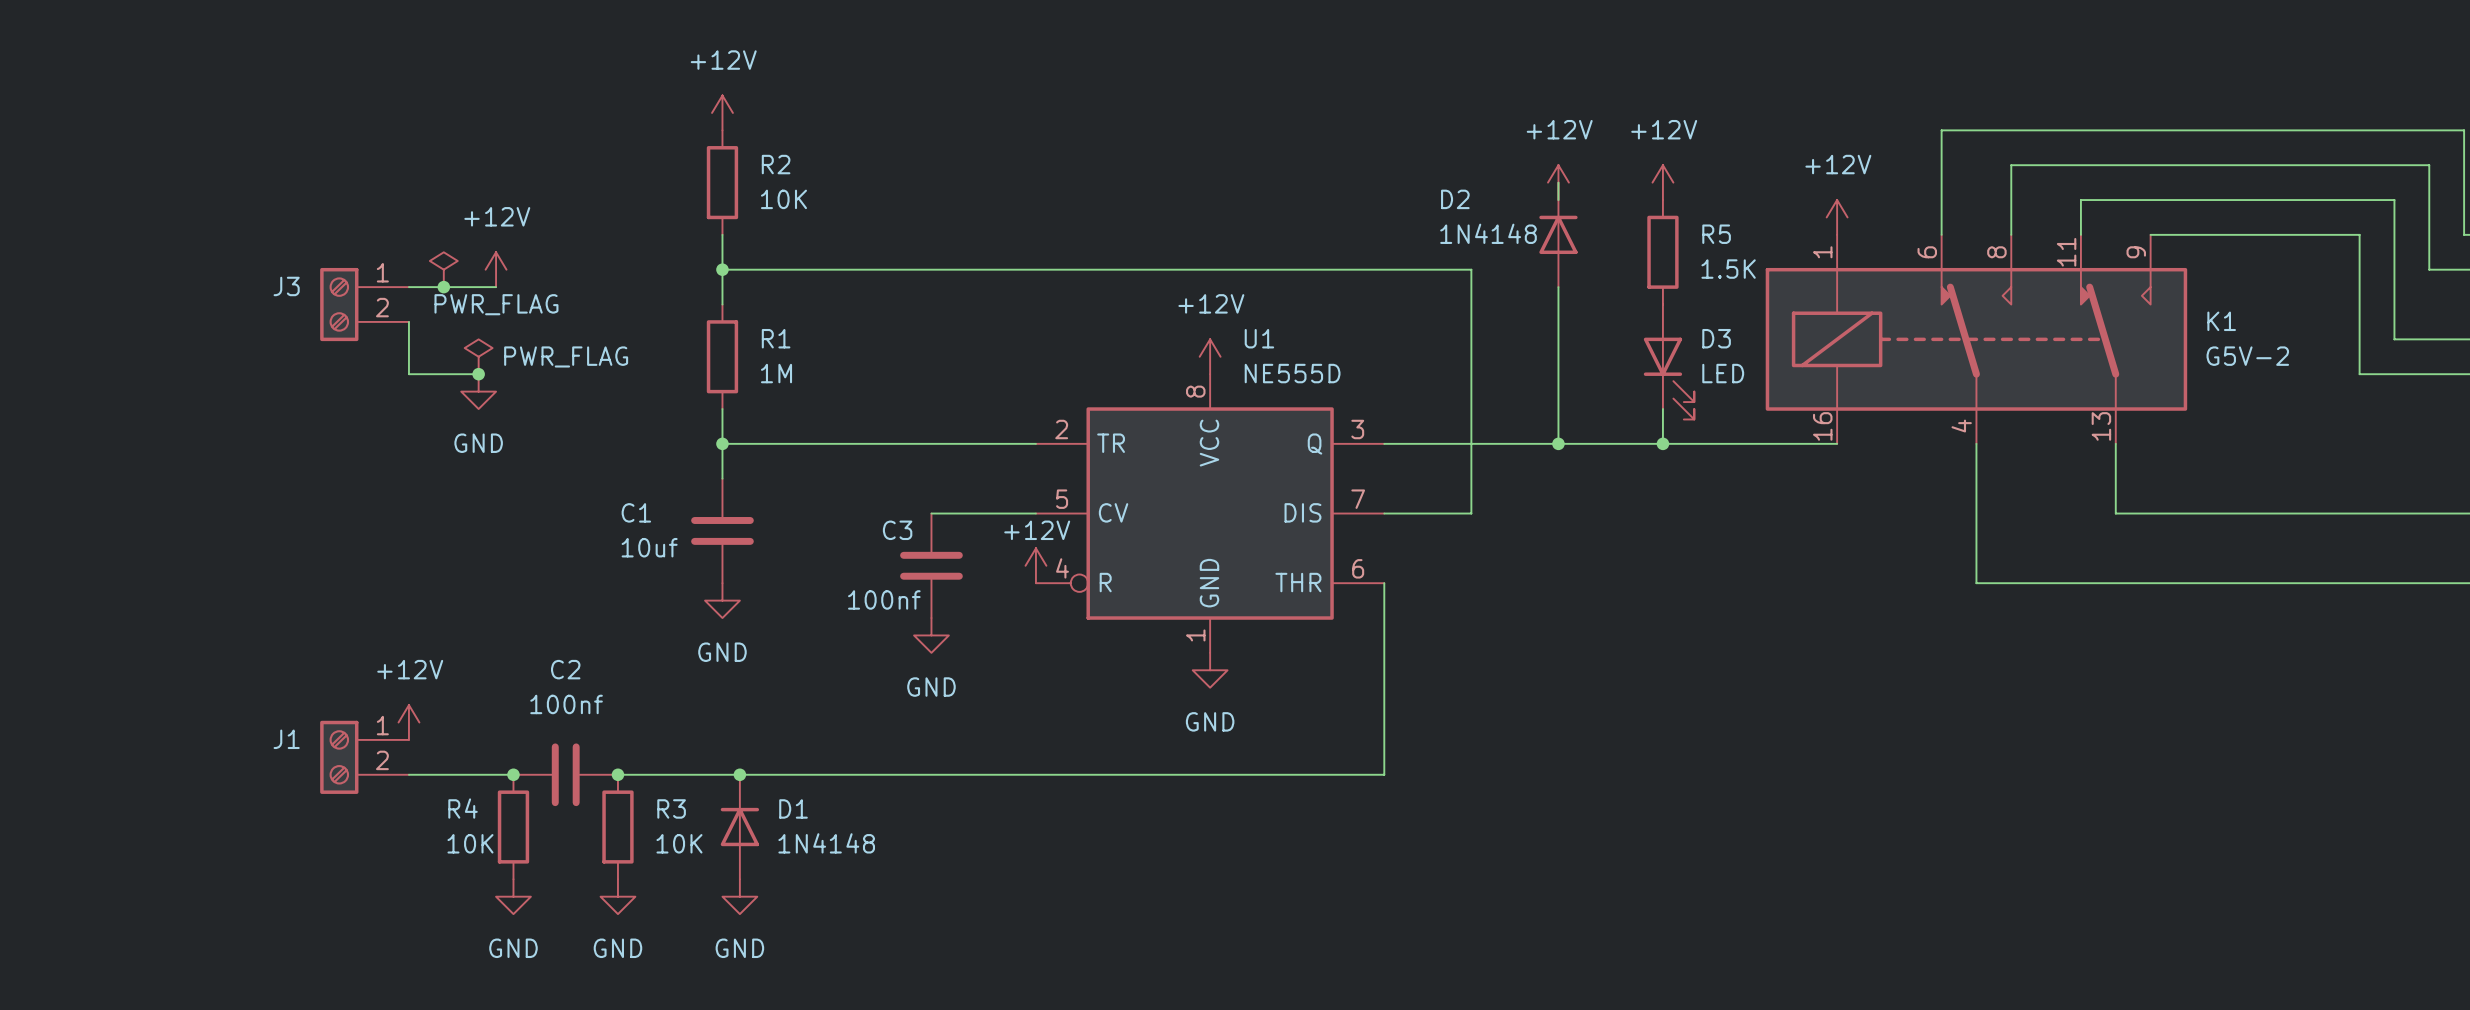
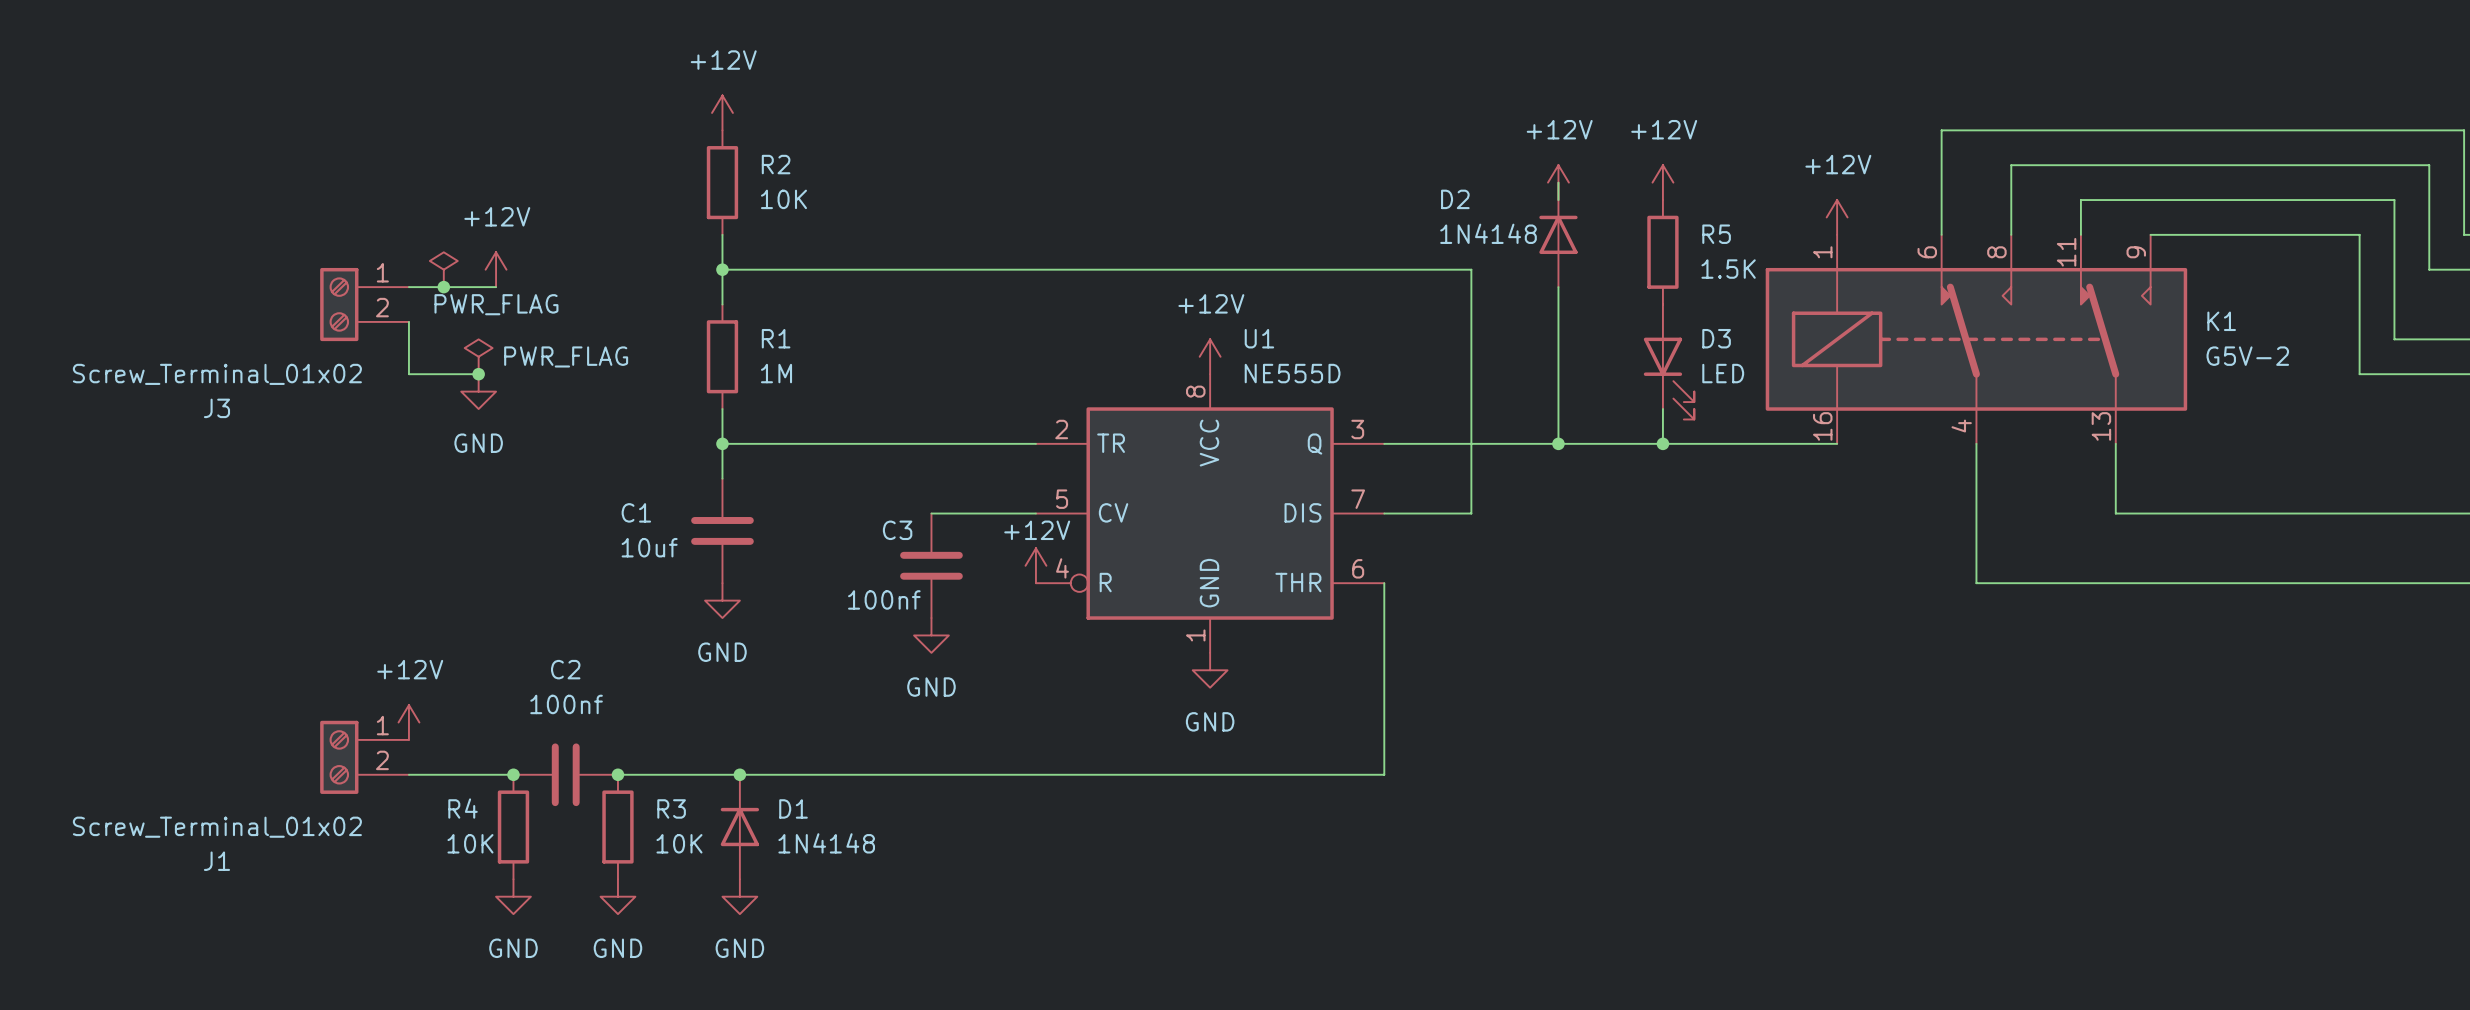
J3 name position: J3 (286, 286) -> J3 (216, 408)
J3 value: none -> Screw_Terminal_01x02 (217, 374)
J1 name position: J1 (286, 739) -> J1 (216, 861)
J1 value: none -> Screw_Terminal_01x02 (217, 827)

